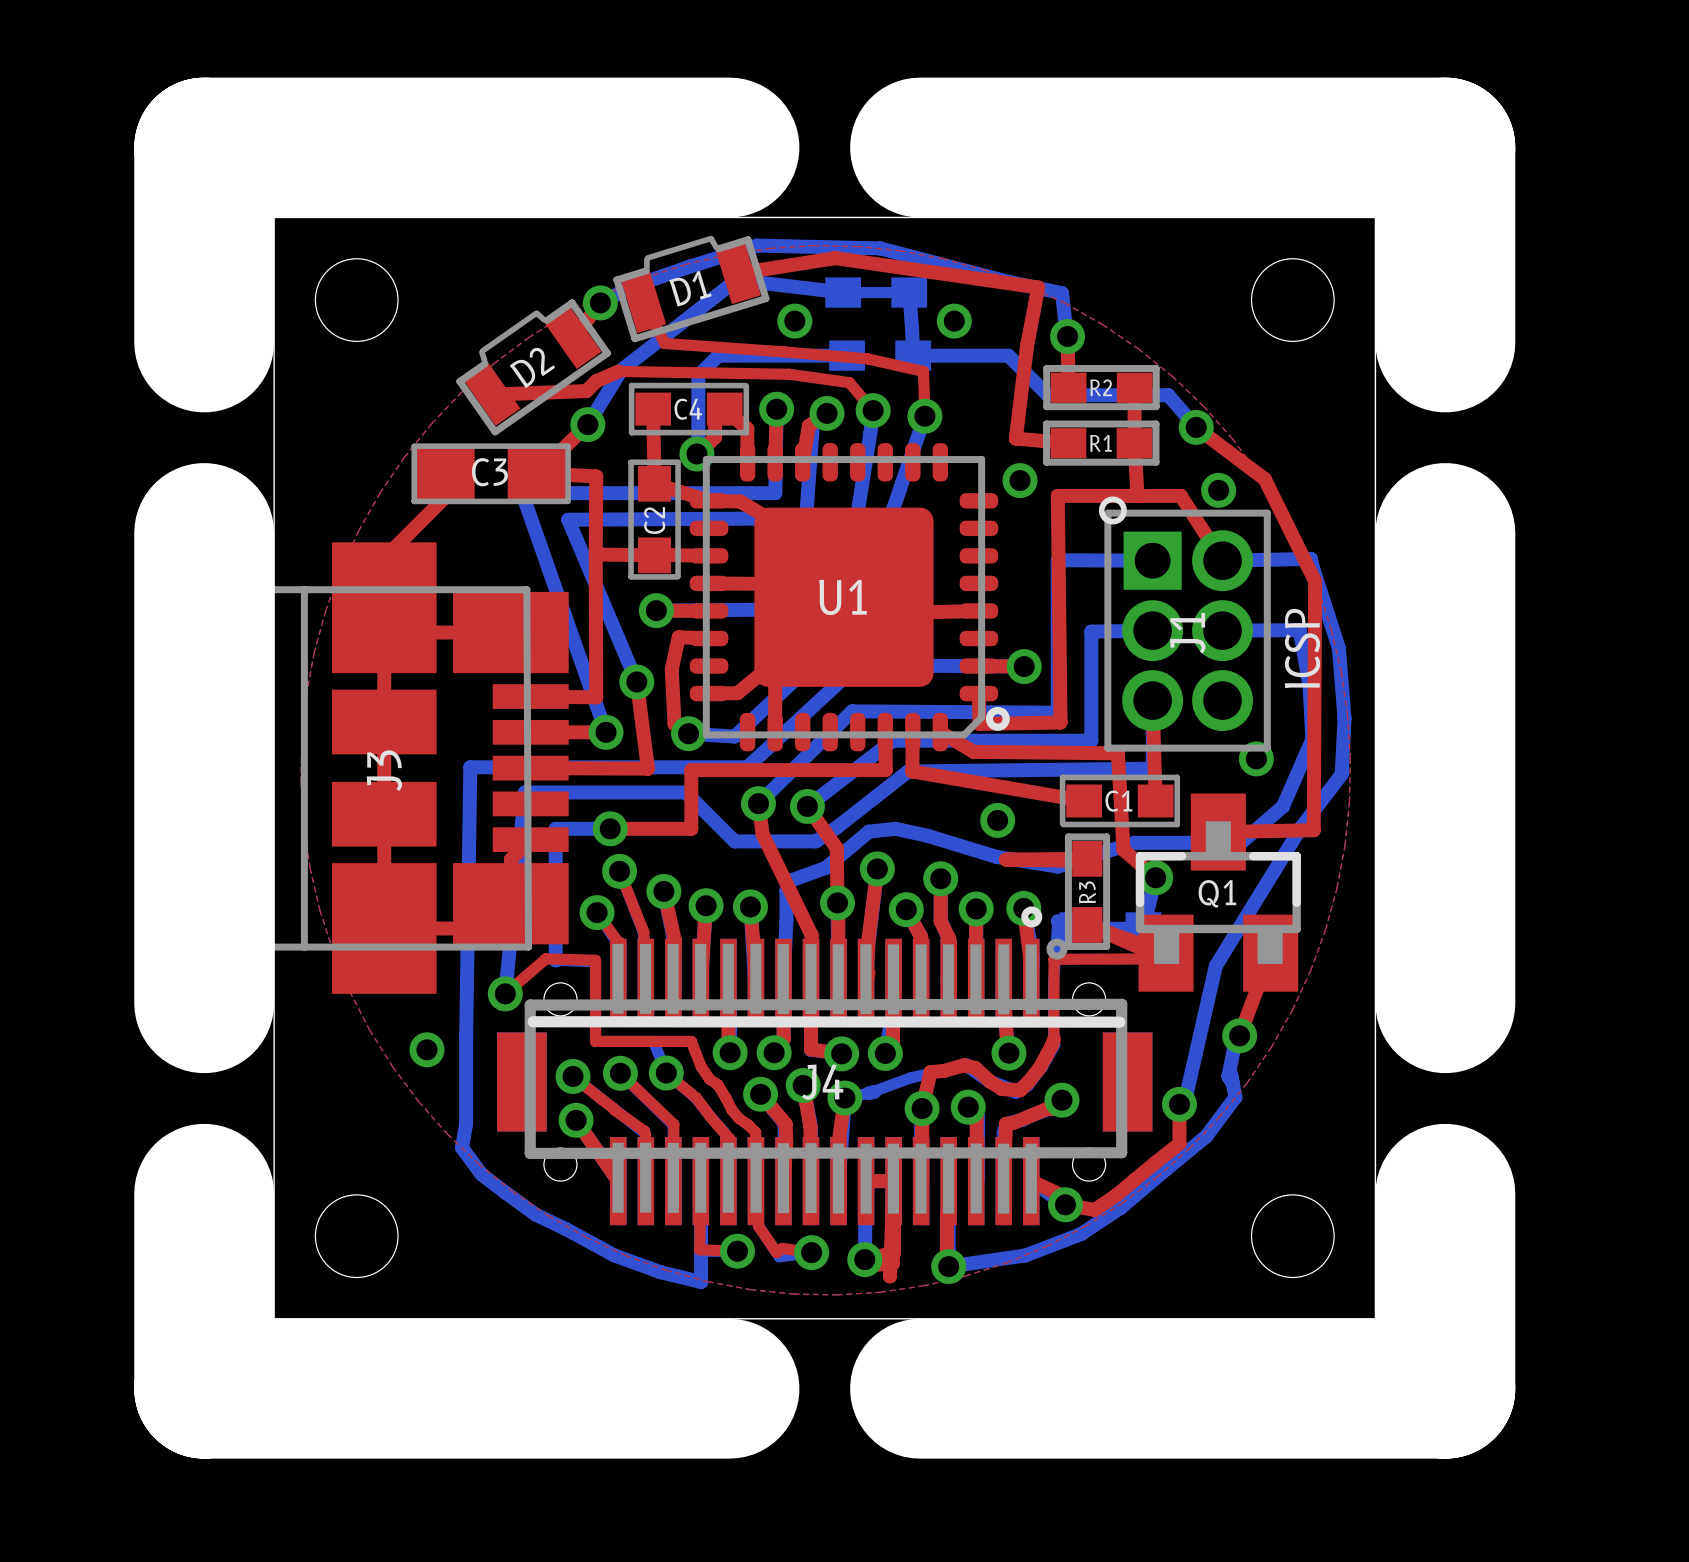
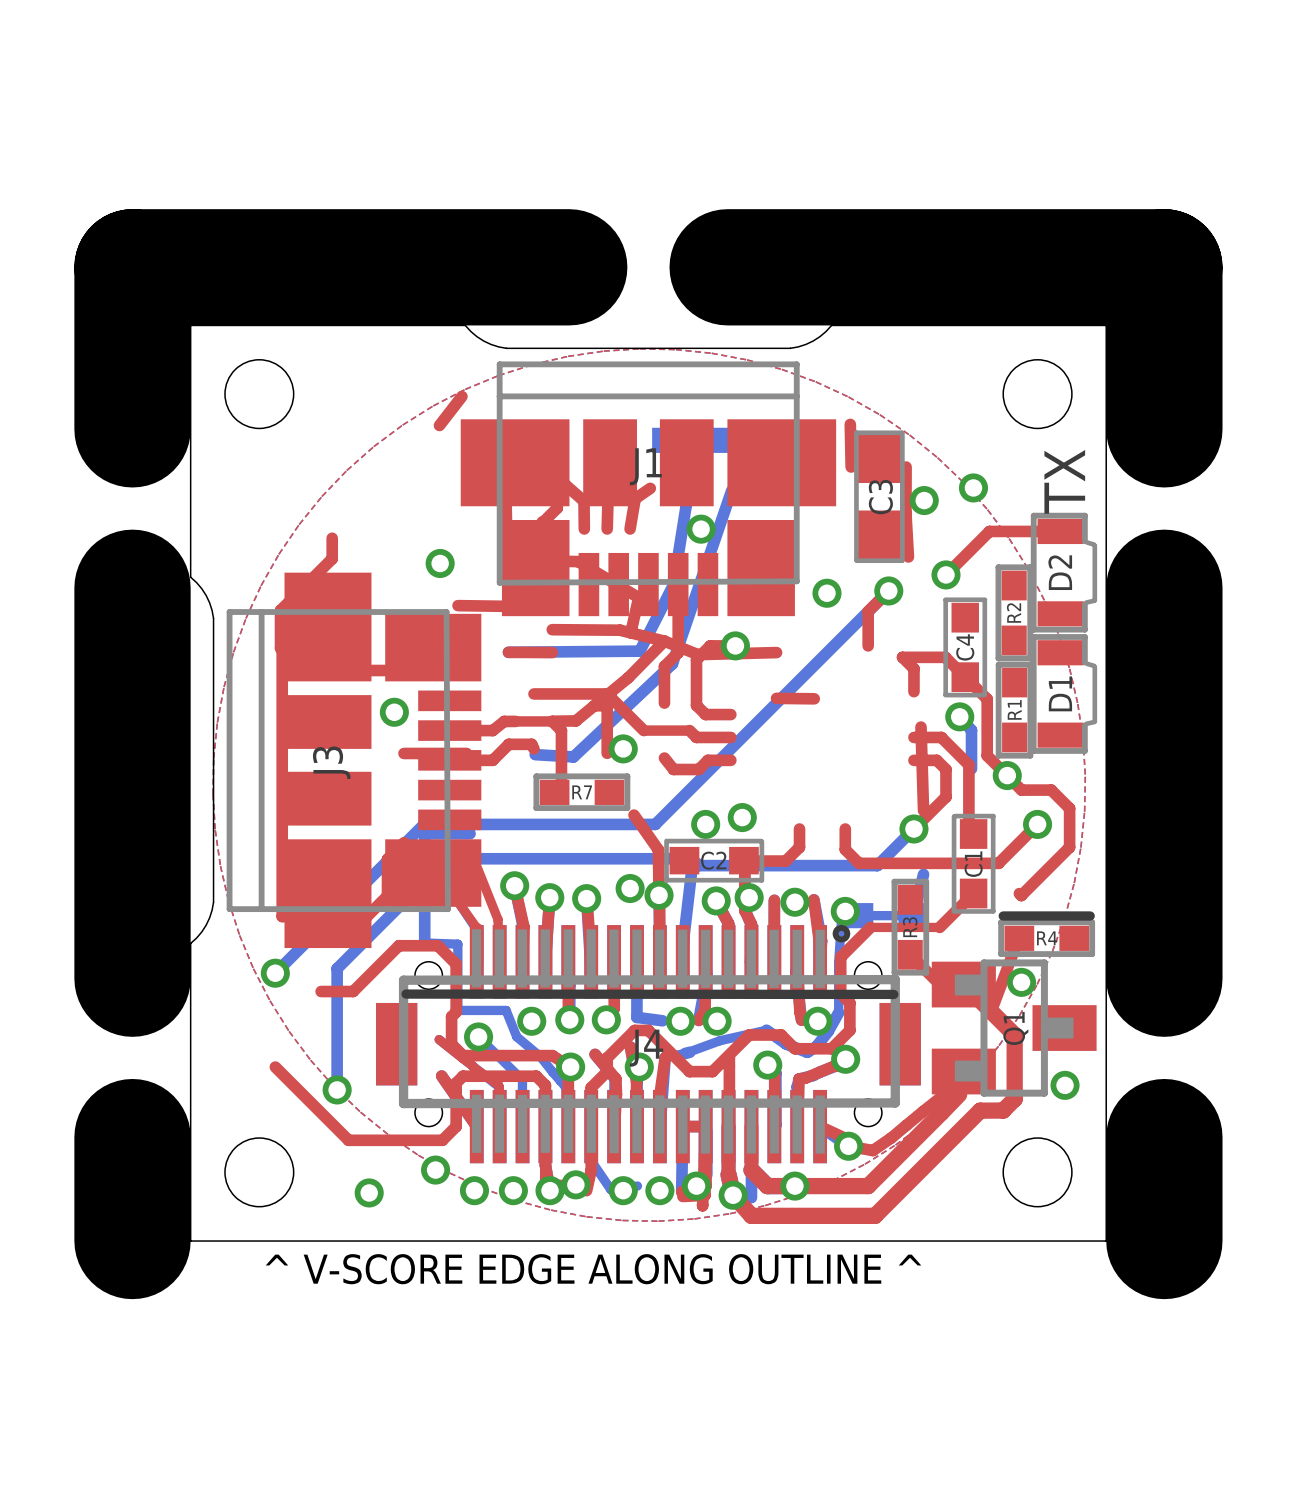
board edge: (604, 217) (1045, 217) -> (465, 325) (483, 340) (506, 348) (790, 348) (813, 340) (831, 325)
top track: (738, 273) (835, 258) (1038, 287) (1027, 346) (1015, 438) (1068, 443) -> none
D1 rotation: 0° (691, 289) -> 107° clockwise (1063, 693)
D1 position: (691, 289) -> (1063, 693)
bottom track: (843, 292) (736, 279) (621, 370) (587, 424) -> none
R4 side: bottom (876, 292) -> top (1046, 938)
bottom track: (909, 292) (913, 355) (1008, 355) (1048, 395) (1168, 395) (1196, 427) -> none
bottom track: (600, 302) (629, 287) (757, 245) (880, 248) (1008, 281) (1061, 293) (1067, 336) -> none
via: (600, 302) -> none
top track: (643, 302) (664, 343) (867, 358) (923, 371) (924, 416) -> none
via: (794, 321) -> none
via: (954, 321) -> none
via: (1067, 336) -> none
bottom track: (847, 355) (718, 355) (698, 375) (696, 453) -> none
D2 rotation: 0° (533, 367) -> 125° clockwise (1063, 572)
D2 position: (533, 367) -> (1063, 572)
R2 rotation: 0° (1101, 387) -> 90° clockwise (1014, 612)
R2 position: (1101, 387) -> (1014, 612)
top track: (492, 394) (586, 391) (596, 381) (618, 371) (789, 374) (849, 382) (873, 410) -> none
text: none -> TX (1064, 481)
C4 rotation: 0° (688, 409) -> 90° clockwise (965, 647)
C4 position: (688, 409) -> (965, 647)
bottom track: (776, 409) (775, 493) (522, 493) (606, 732) -> none
via: (776, 409) -> none
via: (873, 410) -> none
bottom track: (827, 413) (813, 423) (806, 518) (568, 519) (636, 681) -> none
via: (827, 413) -> none
via: (924, 416) -> none
top track: (587, 424) (537, 473) (596, 476) (596, 697) (530, 696) -> none
via: (587, 424) -> none
top track: (1196, 427) (1264, 479) (1315, 581) (1313, 830) (1218, 832) -> none
via position: (1196, 427) -> (973, 487)
via: none -> (924, 500)
R1 rotation: 0° (1101, 443) -> 90° clockwise (1014, 710)
R1 position: (1101, 443) -> (1014, 710)
via: (696, 453) -> none
via: none -> (701, 529)
top track: none -> (1060, 531) (989, 531) (946, 574)
C3 rotation: 0° (491, 473) -> 90° clockwise (879, 496)
C3 position: (491, 473) -> (879, 496)
via: (1020, 480) -> none
via: (1218, 490) -> none
drawing: [1098, 496, 1127, 525] -> none
via: none -> (440, 563)
J1 footprint: [1104, 509, 1271, 752] -> [460, 361, 837, 617]
via: none -> (946, 574)
C2 rotation: 0° (654, 519) -> 90° counterclockwise (714, 860)
C2 position: (654, 519) -> (714, 860)
board edge: (274, 520) (274, 960) -> (190, 577) (206, 595) (213, 618) (213, 902) (206, 925) (190, 943)
top track: none -> (678, 584) (678, 652) (664, 666) (664, 703)
bottom track: none -> (888, 590) (655, 824) (424, 824) (275, 973)
top track: none -> (888, 590) (868, 611) (868, 645)
via: none -> (888, 590)
via: none -> (826, 593)
bottom track: (1152, 560) (1057, 560) (1057, 712) (852, 711) (758, 803) -> none
bottom track: (1222, 560) (1310, 558) (1338, 648) (1344, 718) (1341, 774) (1301, 827) (1215, 965) (1186, 1094) (1179, 1104) -> none
top track: (1222, 560) (1180, 495) (1057, 495) (1060, 722) (979, 723) (978, 693) -> none
U1: (849, 597) -> none
top track: none -> (735, 645) (710, 645) (696, 659) (696, 705) (705, 714) (730, 714)
via: none -> (735, 645)
via: (656, 610) -> none
bottom track: (1152, 630) (1091, 631) (1091, 740) (892, 740) (807, 806) -> none
bottom track: (1222, 630) (1299, 630) (1309, 686) (1312, 739) (1282, 806) (1241, 842) (1134, 842) (1057, 866) (996, 856) (927, 835) (895, 828) (868, 831) (825, 867) (790, 880) (786, 890) (783, 1039) (774, 1052) -> none
top track: (709, 638) (678, 637) (671, 669) (674, 723) (688, 733) -> none
text: ICSP (1302, 648) -> none
top track: none -> (913, 691) (913, 668) (902, 657) (945, 657) (987, 699) (987, 755) (1021, 790) (1051, 790) (1069, 808) (1069, 847) (1021, 895) (1019, 893)
top track: none -> (533, 693) (607, 693) (643, 730) (689, 730) (696, 737) (730, 737)
bottom track: (1024, 666) (857, 665) (747, 767) (470, 767) (466, 1123) (461, 1147) (481, 1174) (536, 1214) (614, 1255) (660, 1272) (701, 1281) (700, 1181) (701, 1242) (705, 1251) (737, 1251) -> none
via: (1024, 666) -> none
top track: (636, 681) (647, 768) (530, 768) -> none
via: (636, 681) -> none
via: none -> (394, 712)
bottom track: none -> (959, 716) (971, 730) (971, 768)
via: none -> (959, 716)
bottom track: (1152, 700) (1152, 768) (908, 771) (836, 827) (815, 841) (734, 841) (685, 792) (524, 792) (505, 993) -> none
top track: none -> (449, 730) (492, 730) (504, 721) (552, 721) (561, 730) (561, 783) (554, 792)
top track: none -> (913, 737) (941, 737) (968, 764) (968, 831) (973, 834)
top track: none -> (533, 748) (531, 744) (508, 744) (492, 760) (449, 760)
via: none -> (623, 748)
via: (606, 732) -> none
top track: (885, 732) (885, 770) (691, 770) (691, 828) (610, 828) -> none
top track: (912, 732) (912, 771) (1084, 800) -> none
top track: (940, 732) (973, 751) (1117, 753) (1123, 849) (1155, 877) -> none
via: (688, 733) -> none
top track: none -> (664, 758) (673, 769) (698, 769) (707, 760) (730, 760)
top track: none -> (913, 760) (936, 760) (946, 769) (946, 796) (913, 829)
J3 position: (415, 768) -> (354, 760)
R7: none -> (581, 792)
Q1 footprint: [1135, 793, 1301, 992] -> [931, 959, 1097, 1097]
C1 rotation: 0° (1119, 800) -> 90° clockwise (973, 863)
C1 position: (1119, 800) -> (973, 863)
top track: (758, 803) (762, 834) (811, 935) (811, 1049) (841, 1053) -> none
via: (758, 803) -> none
via: (807, 806) -> none
via: none -> (742, 817)
via: none -> (705, 824)
top track: none -> (1037, 824) (998, 863) (859, 863) (845, 849) (845, 829)
via: none -> (1037, 824)
via: (997, 820) -> none
top track: none -> (799, 829) (799, 847) (785, 861) (744, 861)
bottom track: none -> (913, 829) (877, 865) (698, 865) (691, 858) (447, 858) (337, 968) (337, 1089)
via: none -> (913, 829)
via: (610, 828) -> none
top track: (1092, 856) (1087, 858) (1006, 859) (1087, 860) -> none
top track: (877, 868) (868, 938) (866, 982) (868, 973) -> none
via: (877, 868) -> none
via: (619, 871) -> none
via: (1155, 877) -> none
via: (940, 878) -> none
R3 position: (1087, 891) -> (910, 927)
via: none -> (630, 888)
top track: none -> (973, 893) (939, 927) (870, 927) (840, 957) (840, 993) (849, 1002) (849, 1030) (831, 1048) (794, 1048) (781, 1035) (749, 1035) (712, 1071) (689, 1071) (648, 1030) (634, 1030) (607, 1057) (607, 1071) (591, 1087) (591, 1170) (586, 1190)
via: none -> (749, 897)
J4 footprint: [497, 906, 1153, 1226] -> [376, 924, 921, 1164]
via: (976, 908) -> none
via: (1023, 908) -> none
via: none -> (794, 902)
via: (597, 912) -> none
via: none -> (845, 911)
line: none -> (1003, 915) (1090, 915)
top track: (1166, 953) (1087, 924) (1165, 958) (1054, 959) (1054, 1039) (1039, 1067) (1028, 1081) (1020, 1090) (1001, 1088) (975, 1067) (964, 1065) (930, 1072) (922, 1108) (919, 1112) (922, 1107) -> none
top track: none -> (910, 954) (944, 989) (963, 984) (1014, 1035) (1014, 1099) (1003, 1110) (980, 1110) (875, 1215) (751, 1215) (733, 1195) (728, 1174) (728, 1126)
top track: (505, 993) (545, 958) (595, 960) (595, 1041) (691, 1041) (701, 1066) (709, 1079) (717, 1084) (738, 1118) (755, 1132) (758, 1226) (776, 1252) (782, 1248) (811, 1252) -> none
via: (505, 993) -> none
via: none -> (275, 973)
bottom track: (1239, 1035) (1234, 1048) (1228, 1076) (1232, 1083) (1231, 1074) (1235, 1097) (1206, 1136) (1120, 1207) (1080, 1234) (1025, 1255) (948, 1266) -> none
via position: (1239, 1035) -> (1021, 982)
via: (426, 1049) -> none
via: (841, 1053) -> none
via: (885, 1053) -> none
via position: (1008, 1053) -> (817, 1021)
via: none -> (680, 1021)
via: none -> (717, 1021)
top track: (620, 1073) (673, 1124) (672, 1214) -> none
top track: (666, 1073) (695, 1097) (729, 1138) (727, 1183) (727, 1181) -> (321, 991) (353, 991) (398, 945) (437, 945) (456, 964) (456, 1012) (451, 1016) (451, 1044) (463, 1055) (552, 1055) (570, 1067) (568, 1073) (568, 1126)
via position: (666, 1073) -> (531, 1021)
via: (573, 1076) -> none
via: (803, 1085) -> none
via position: (760, 1094) -> (570, 1067)
via: (844, 1098) -> none
via: (1179, 1104) -> none
via: (922, 1108) -> none
top track: none -> (275, 1067) (348, 1140) (442, 1140) (456, 1126) (456, 1083) (463, 1076) (536, 1076) (545, 1085) (545, 1165) (550, 1190)
via: none -> (639, 1067)
top track: none -> (963, 1071) (959, 1094) (868, 1186) (767, 1186) (751, 1170) (751, 1126)
via: (576, 1120) -> none
via: none -> (1065, 1085)
via: none -> (337, 1089)
top track: (946, 1213) (946, 1258) -> none
via: none -> (435, 1170)
via: (811, 1252) -> none
via: none -> (696, 1186)
via: none -> (794, 1186)
via: none -> (474, 1190)
via: none -> (513, 1190)
via: none -> (550, 1190)
via: none -> (623, 1190)
via: none -> (659, 1190)
via: (864, 1259) -> none
via: none -> (369, 1192)
via position: (948, 1266) -> (733, 1195)
board edge: (204, 1318) (204, 1388) (729, 1388) -> none
board edge: (1445, 1318) (1445, 1388) (920, 1388) -> none
text: none -> ^ V-SCORE EDGE ALONG OUTLINE ^ (593, 1269)

